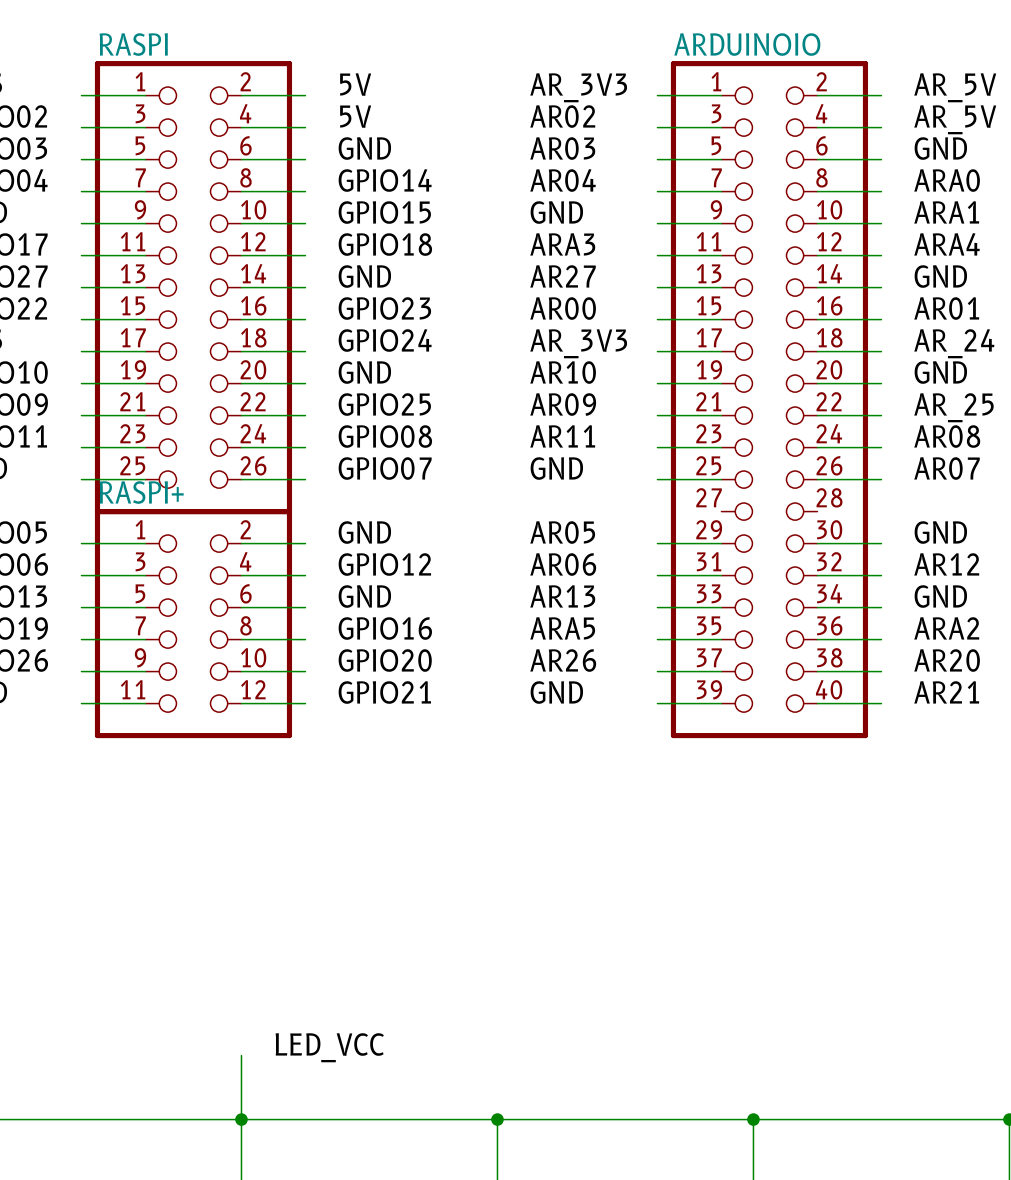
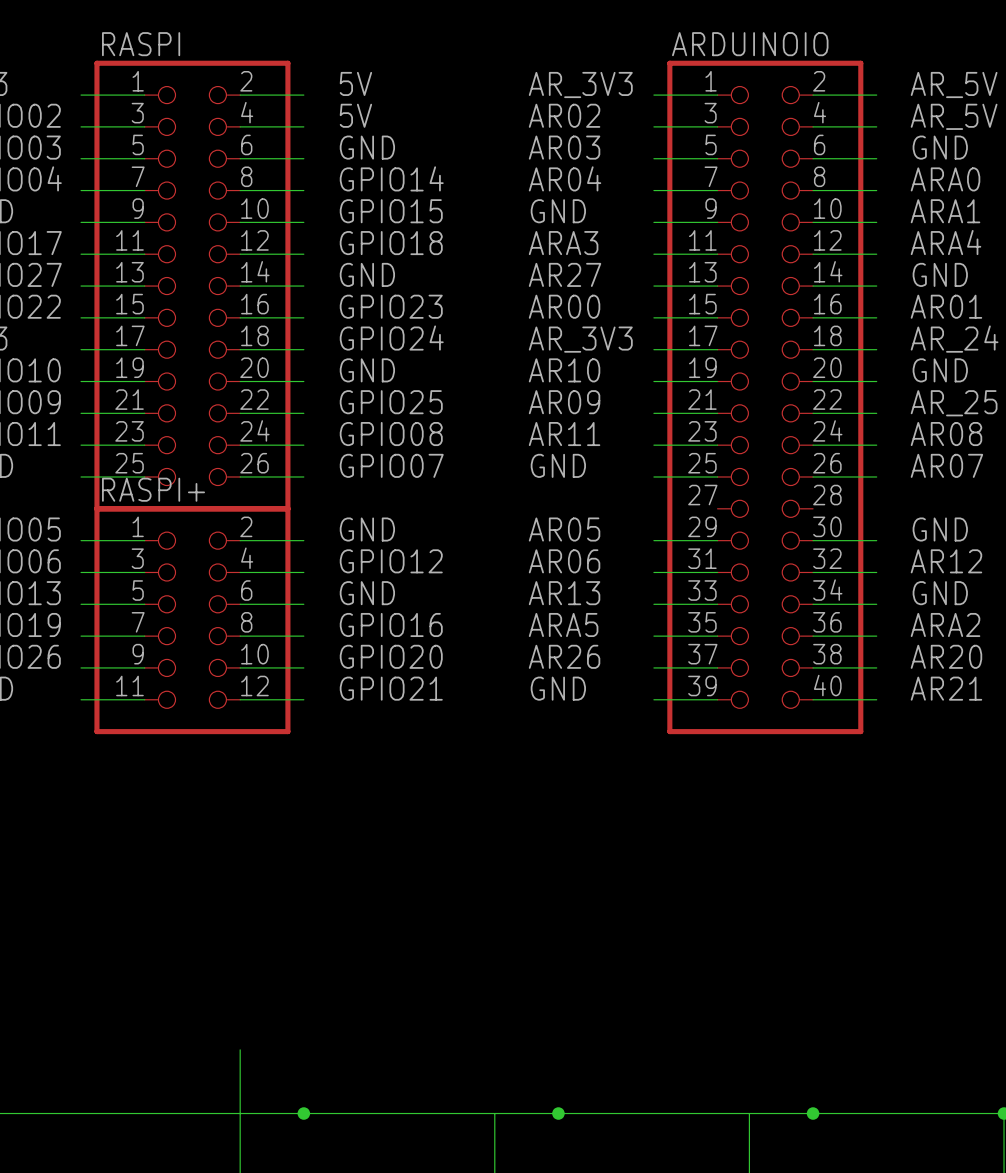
label: LED_VCC (329, 1047) -> none
junction position: (241, 1119) -> (303, 1113)
junction position: (497, 1119) -> (558, 1113)
junction position: (753, 1119) -> (813, 1113)

